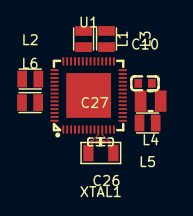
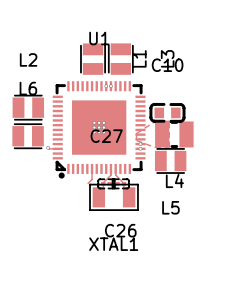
via: none -> (106, 86)
via: none -> (110, 86)
zone outline: none -> (155, 121) (136, 133) (136, 140) (155, 147) (169, 147) (169, 121) (155, 121)
via: none -> (94, 122)
via: none -> (99, 122)
via: none -> (103, 122)
via: none -> (94, 127)
via: none -> (99, 127)
via: none -> (103, 127)
via: none -> (94, 132)
via: none -> (99, 132)
via: none -> (103, 132)
via: none -> (140, 144)
track: none -> (48, 147) (57, 148)
via: none -> (48, 147)
via: none -> (140, 148)
track: none -> (92, 168) (92, 179) (88, 183)

